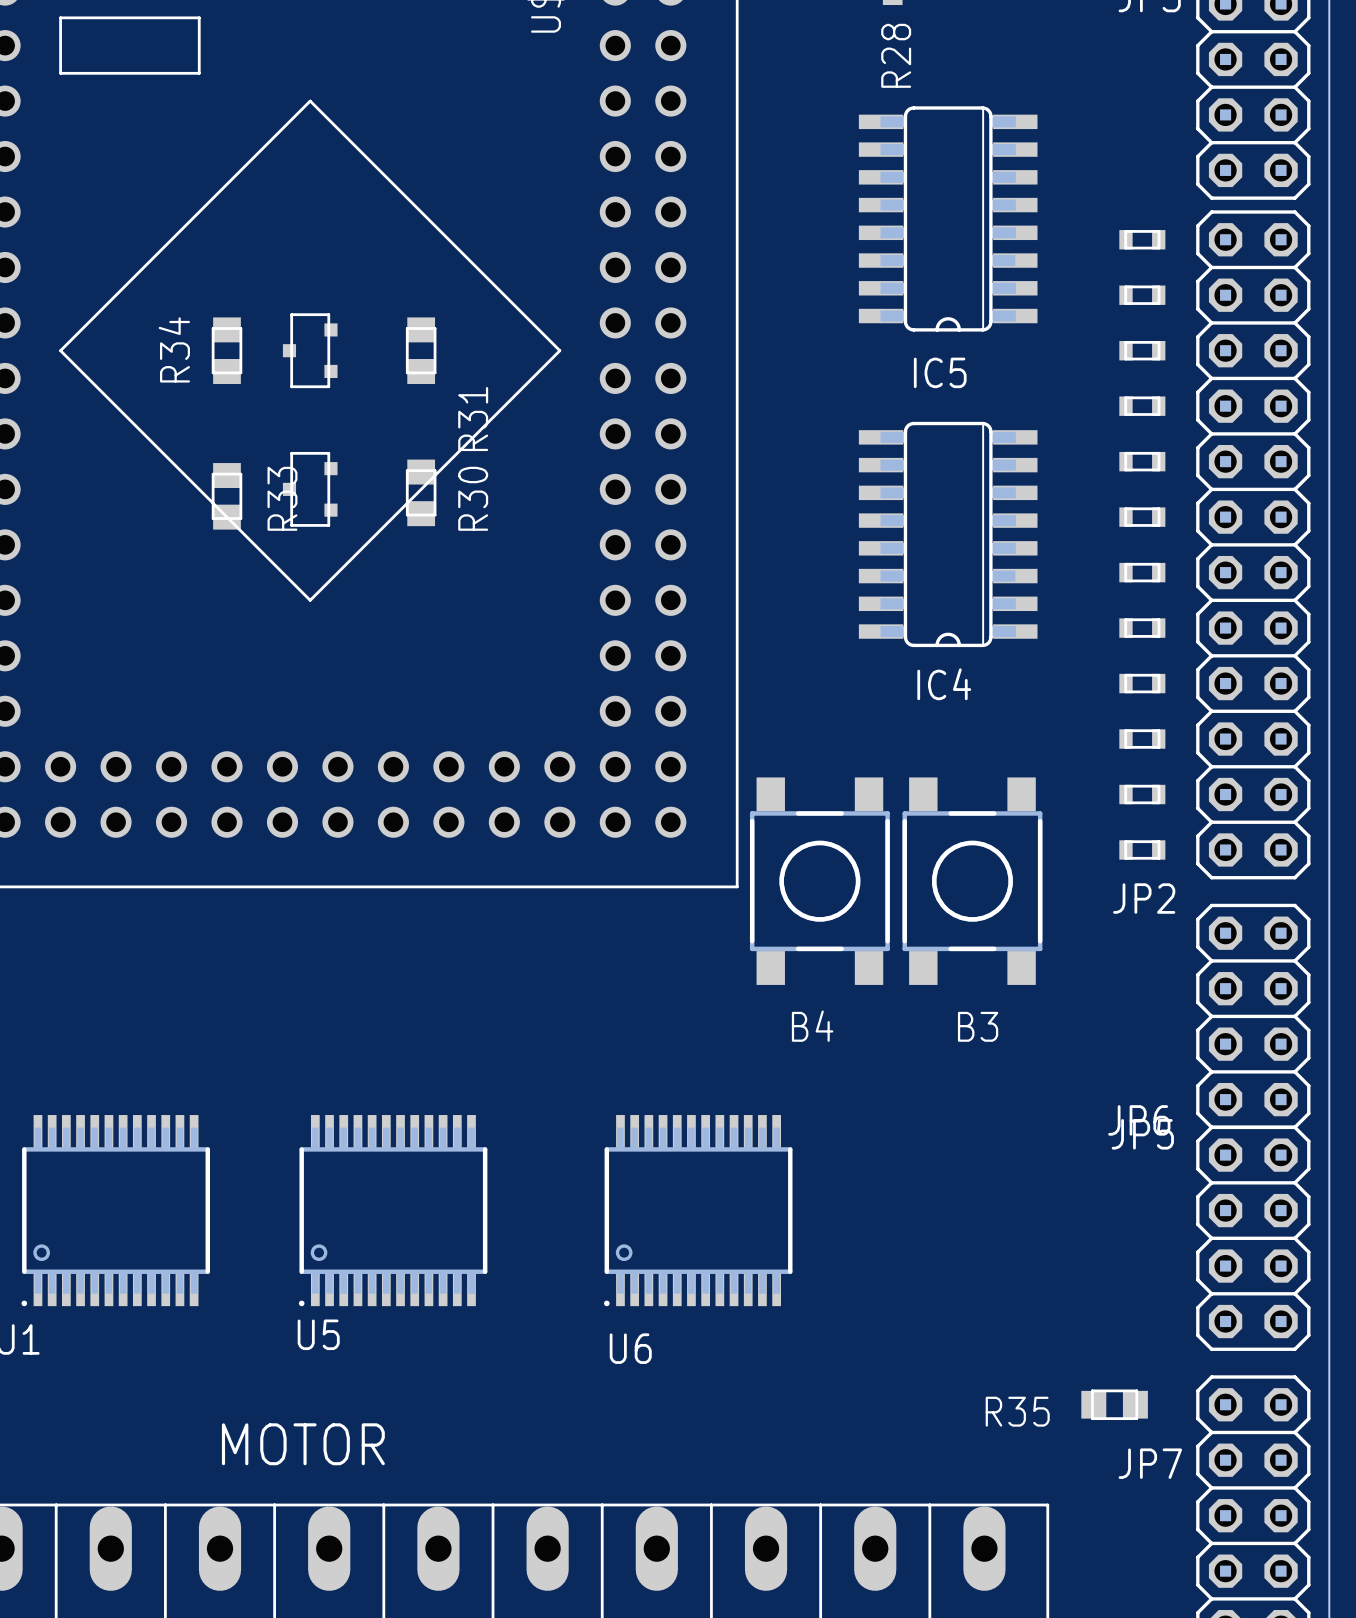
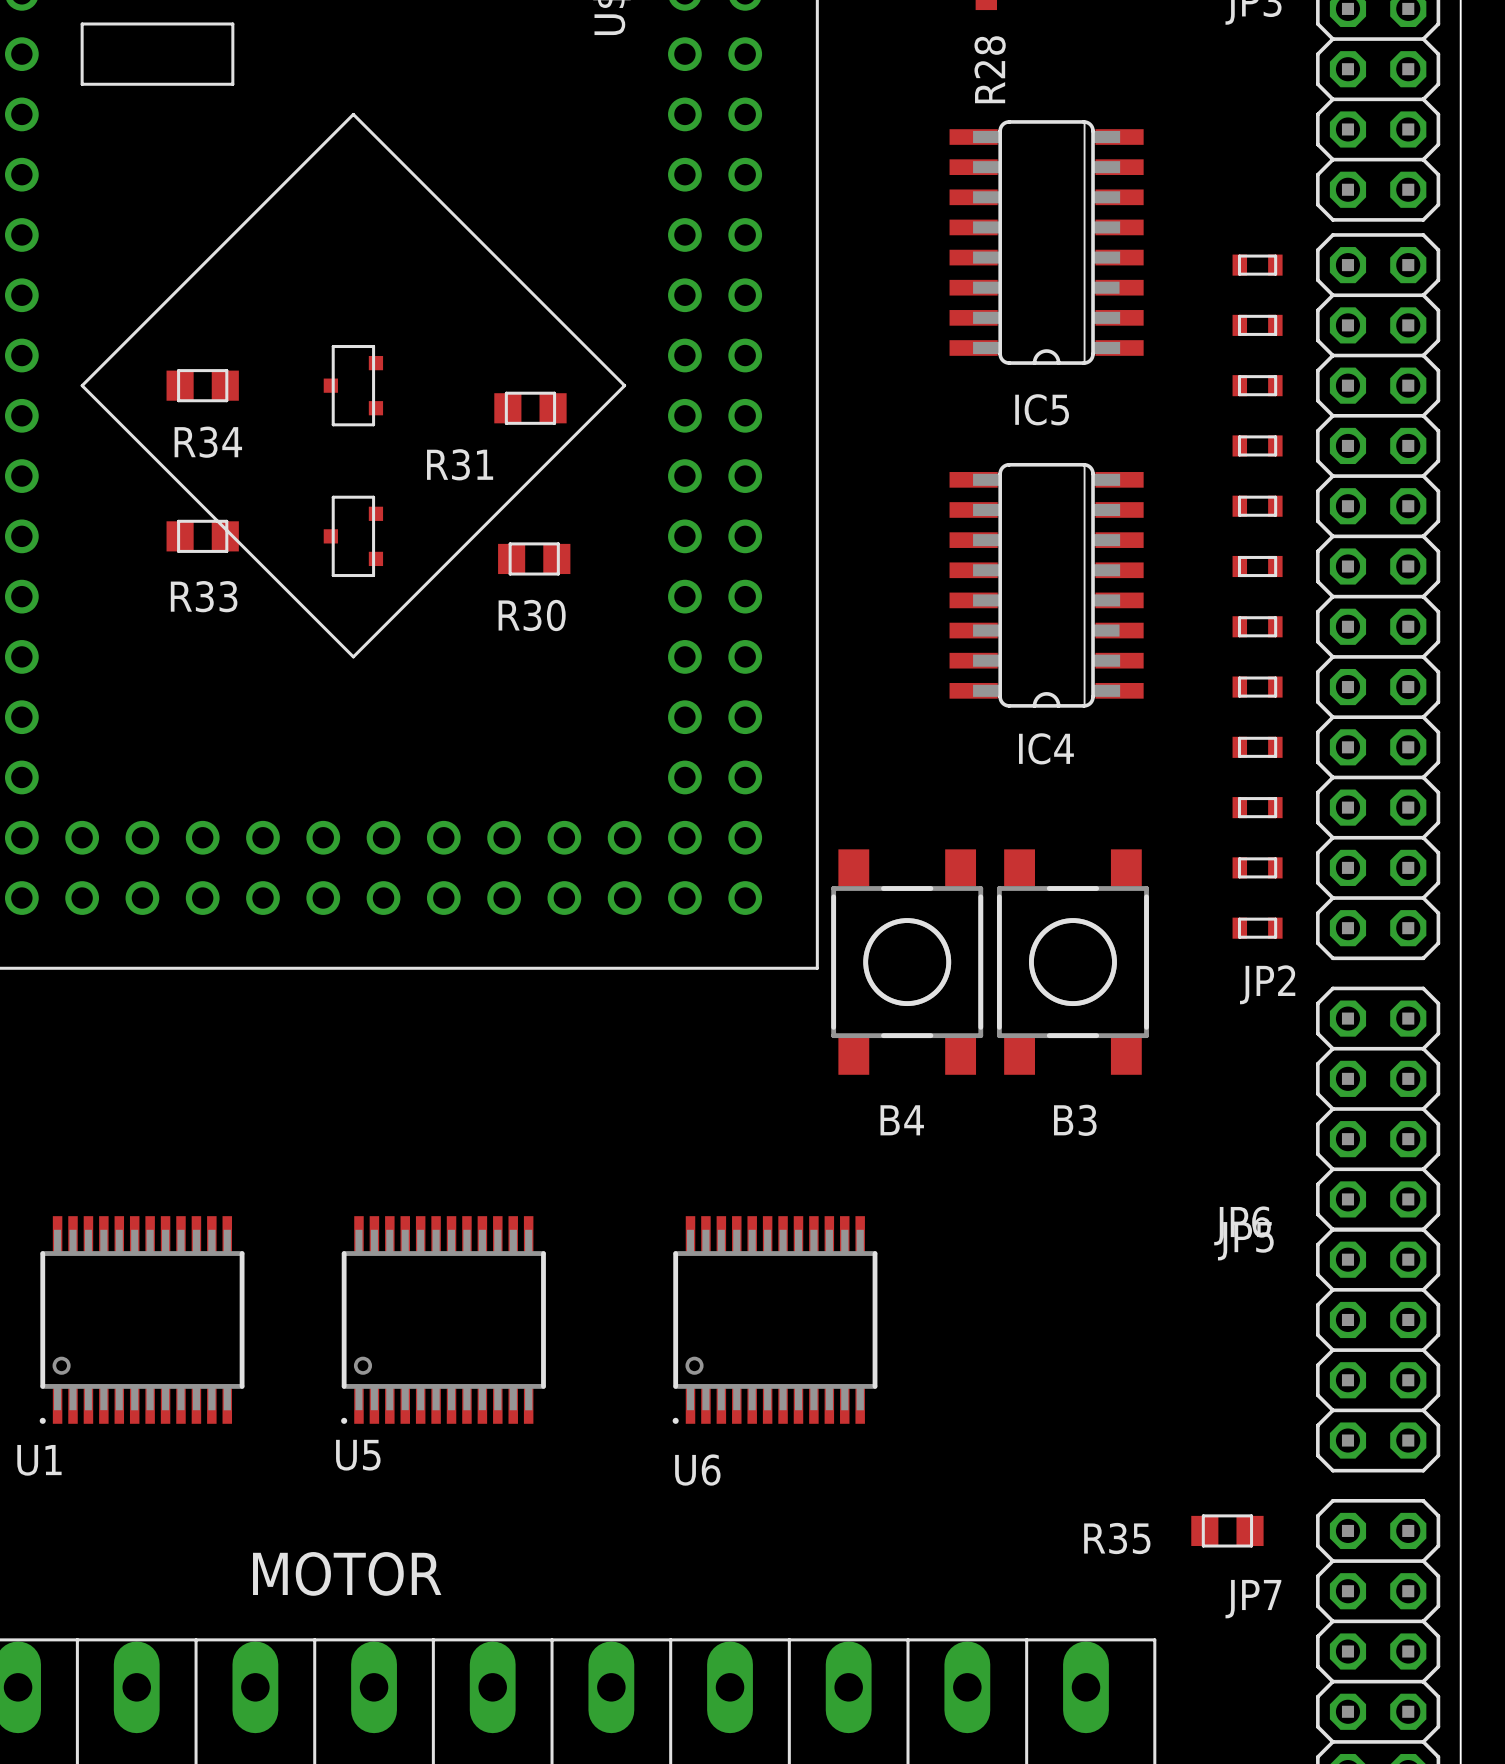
R34 name position: R34 (174, 349) -> R34 (208, 442)
R34 rotation: 0° (227, 350) -> 90° clockwise (202, 385)
R34 position: (227, 350) -> (202, 385)
R31 rotation: 0° (421, 350) -> 90° clockwise (530, 408)
R31 position: (421, 350) -> (530, 408)
R30 rotation: 0° (421, 492) -> 90° clockwise (534, 558)
R30 position: (421, 492) -> (534, 558)
R33 rotation: 0° (227, 496) -> 90° clockwise (202, 536)
R33 position: (227, 496) -> (202, 536)

